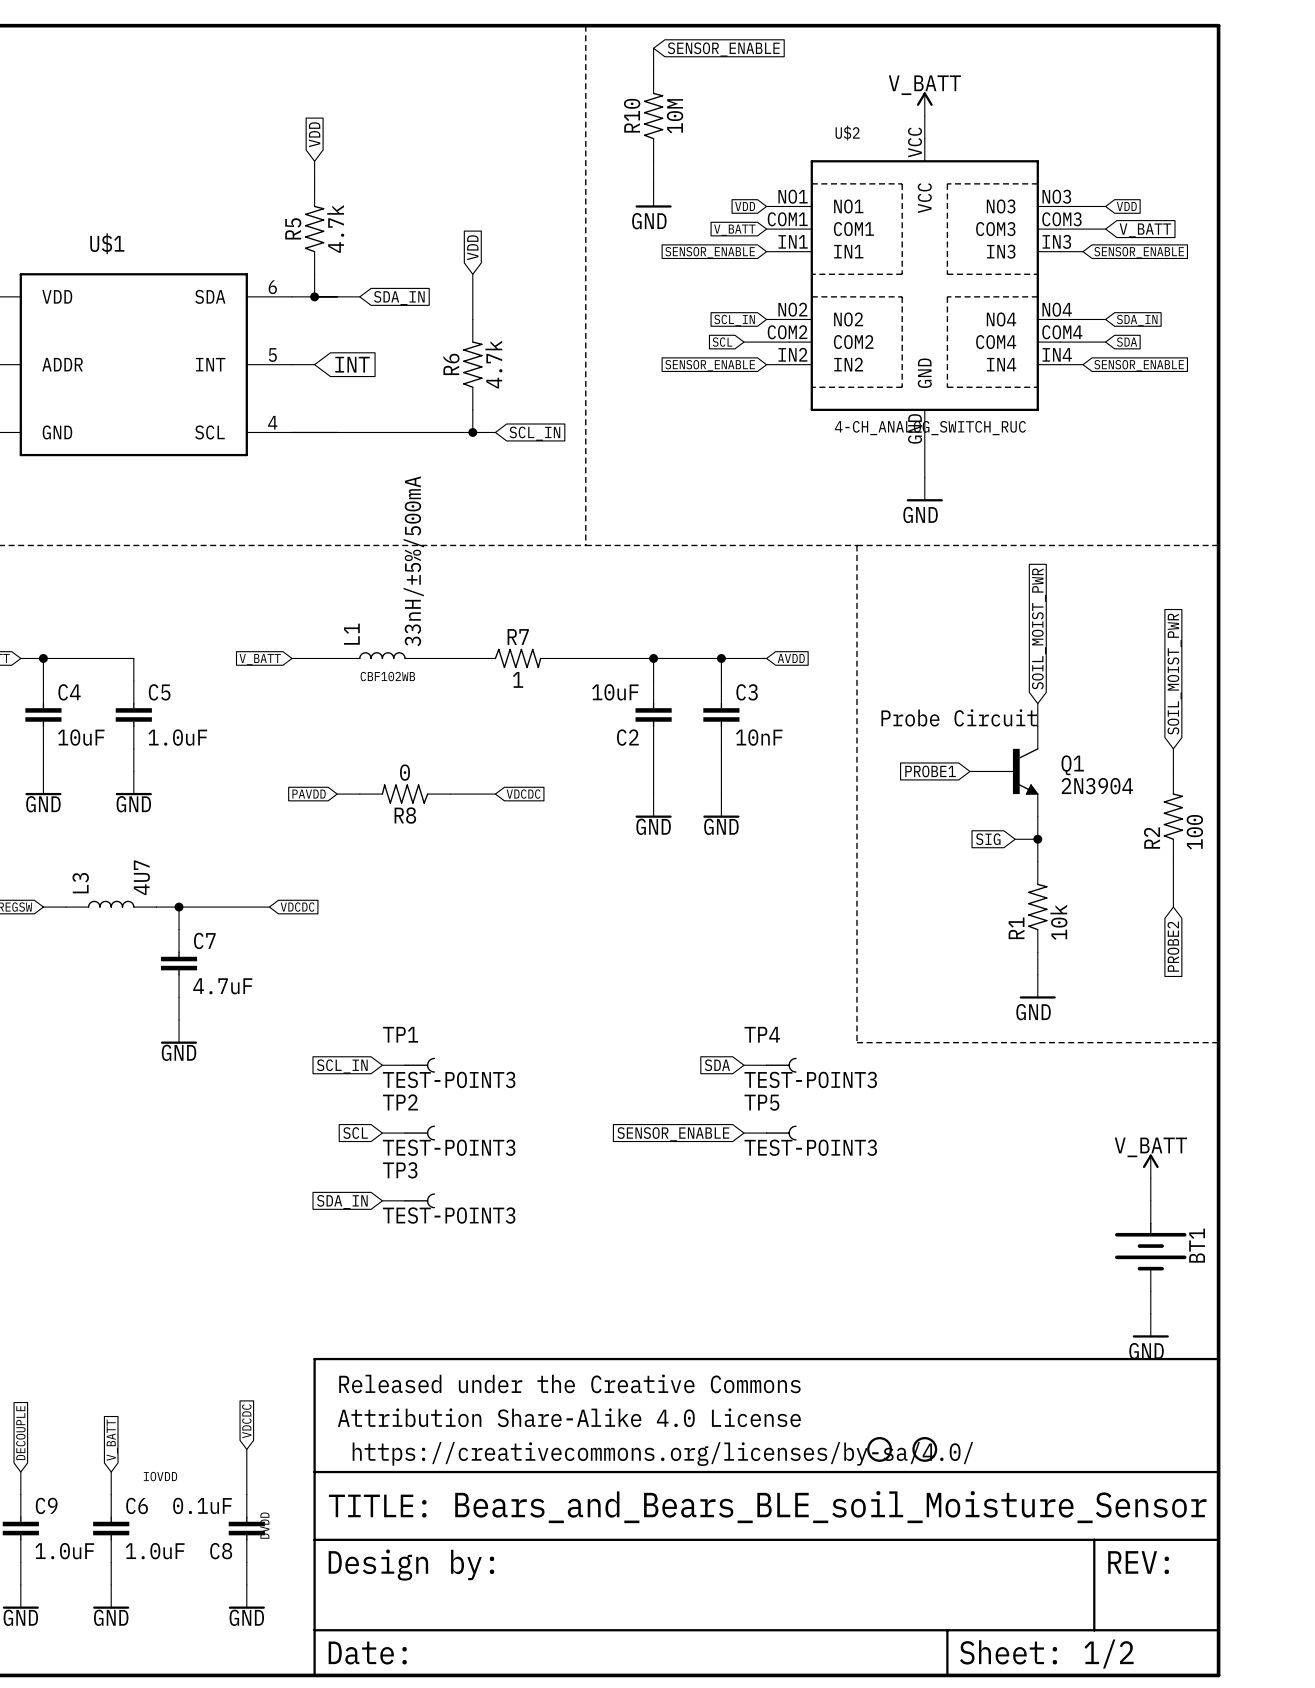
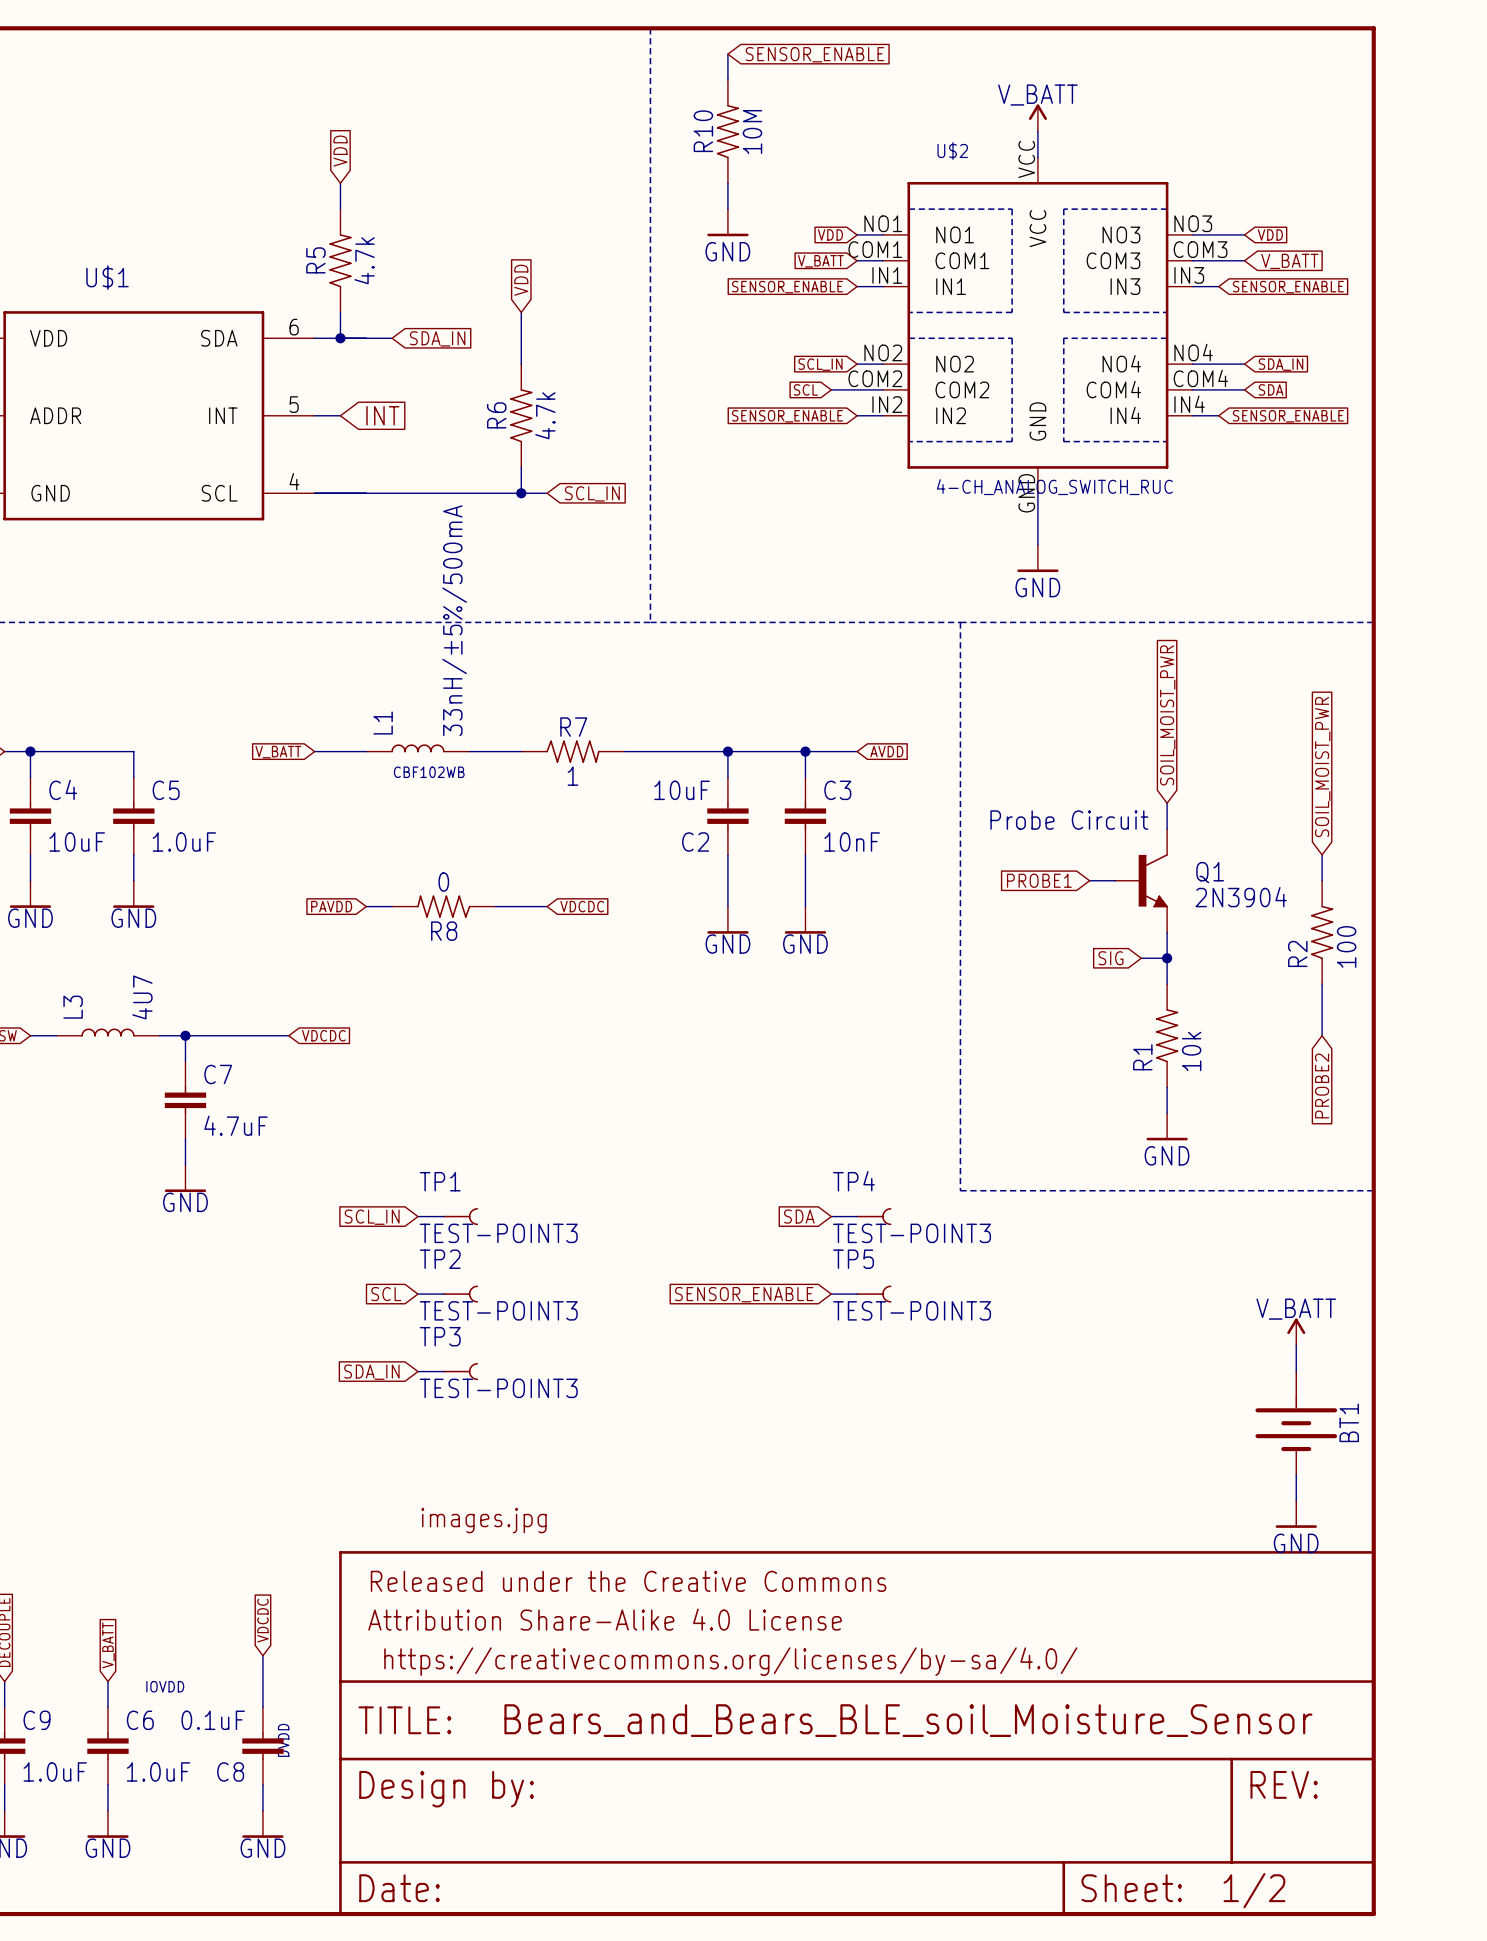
part: none -> (484, 1520)
part: (879, 1449) -> none
part: (924, 1449) -> none

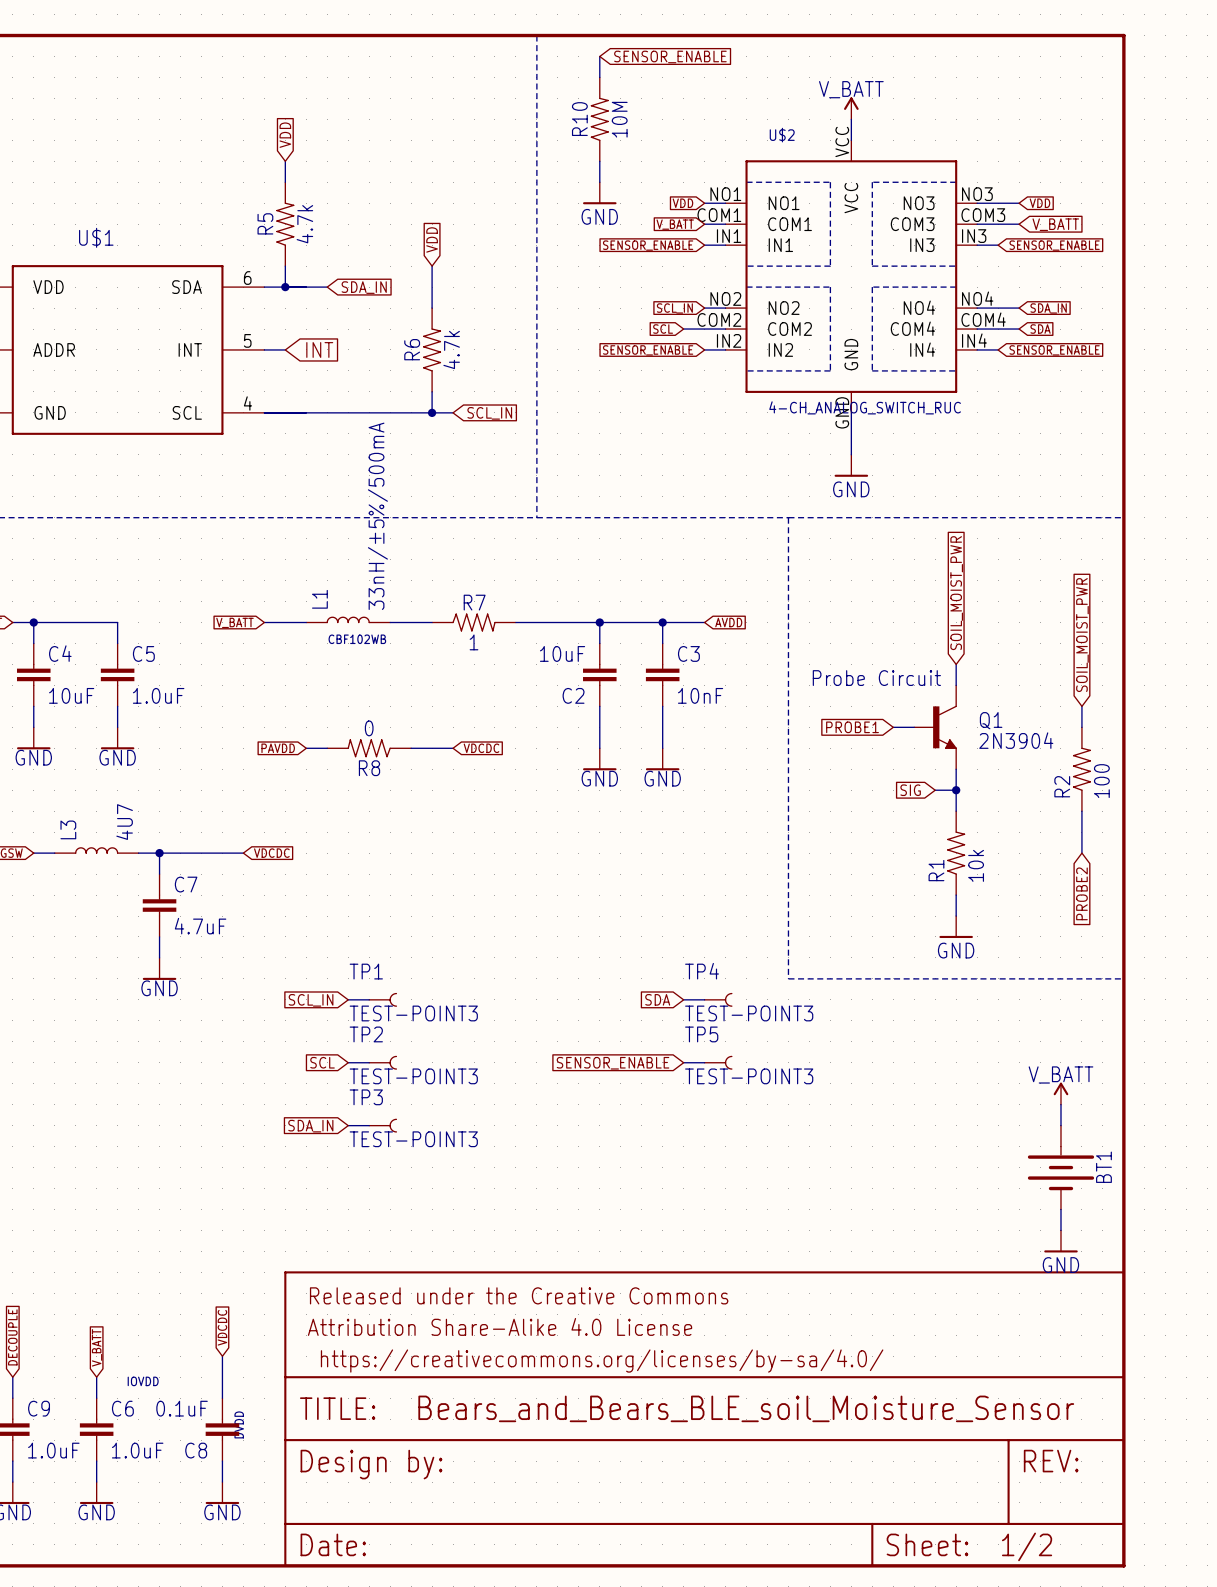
part: (484, 1520) -> none

